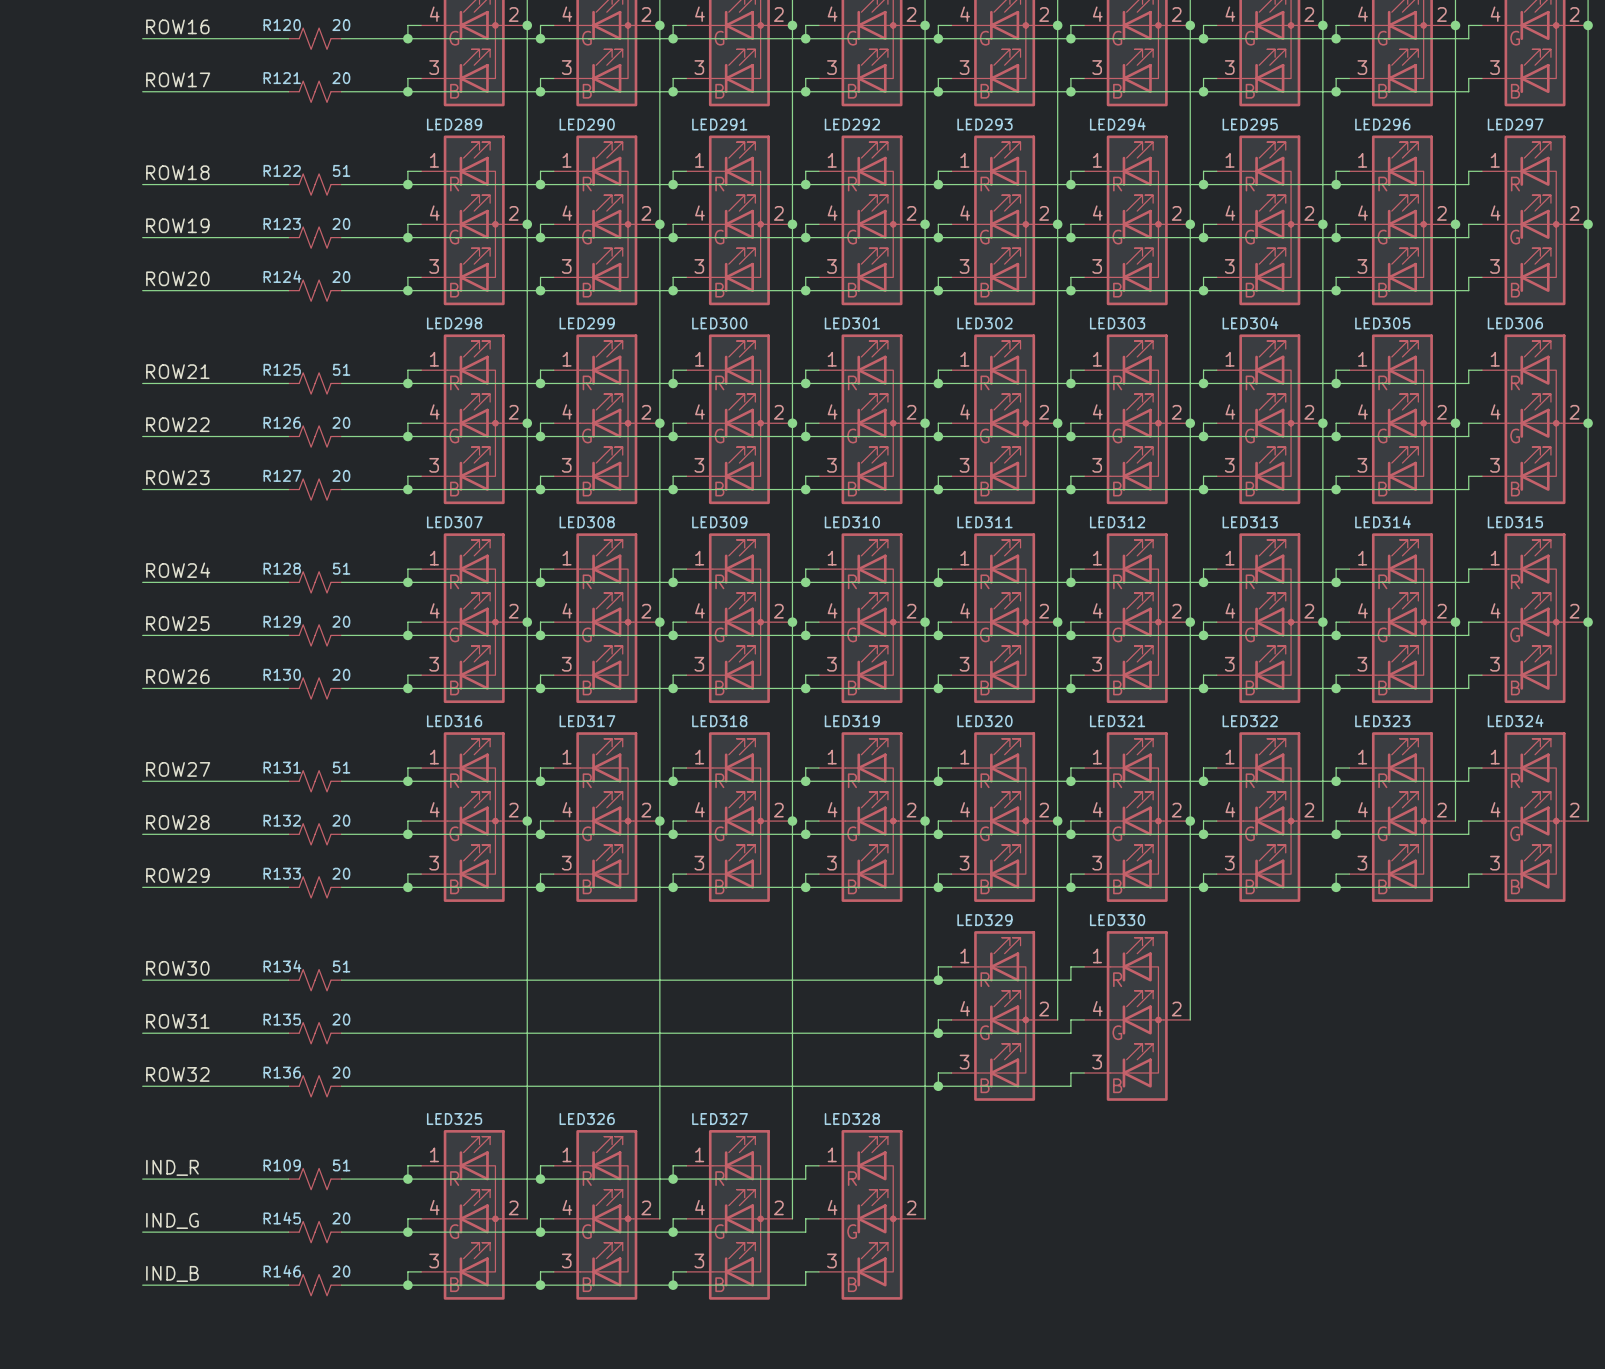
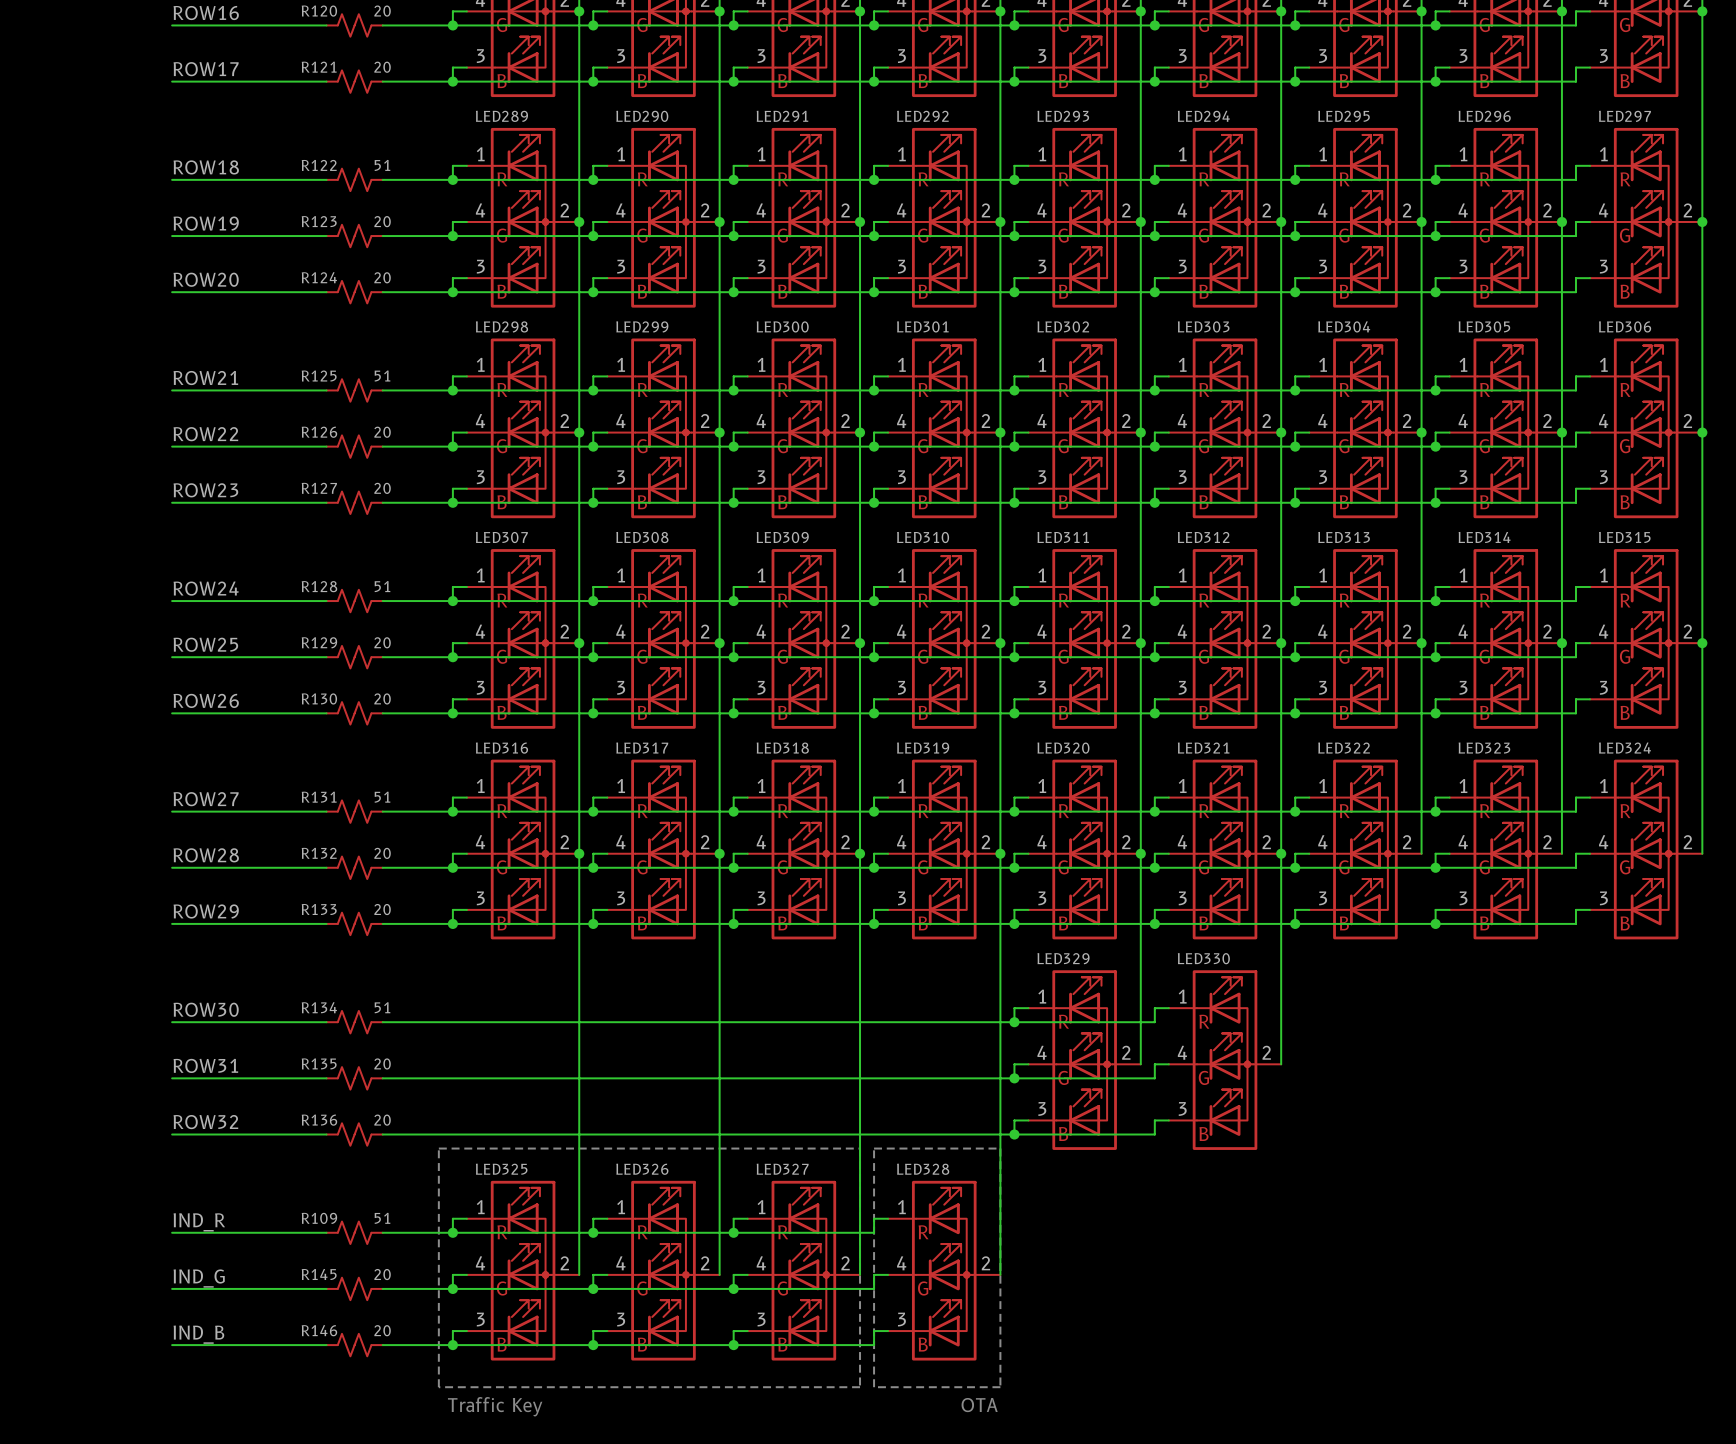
line: none -> (438, 1148) (860, 1148) (860, 1387) (438, 1387) (438, 1148)
line: none -> (874, 1148) (1000, 1148) (1000, 1387) (874, 1387) (874, 1148)
text: none -> OTA (979, 1405)
text: none -> Traffic Key (495, 1406)

